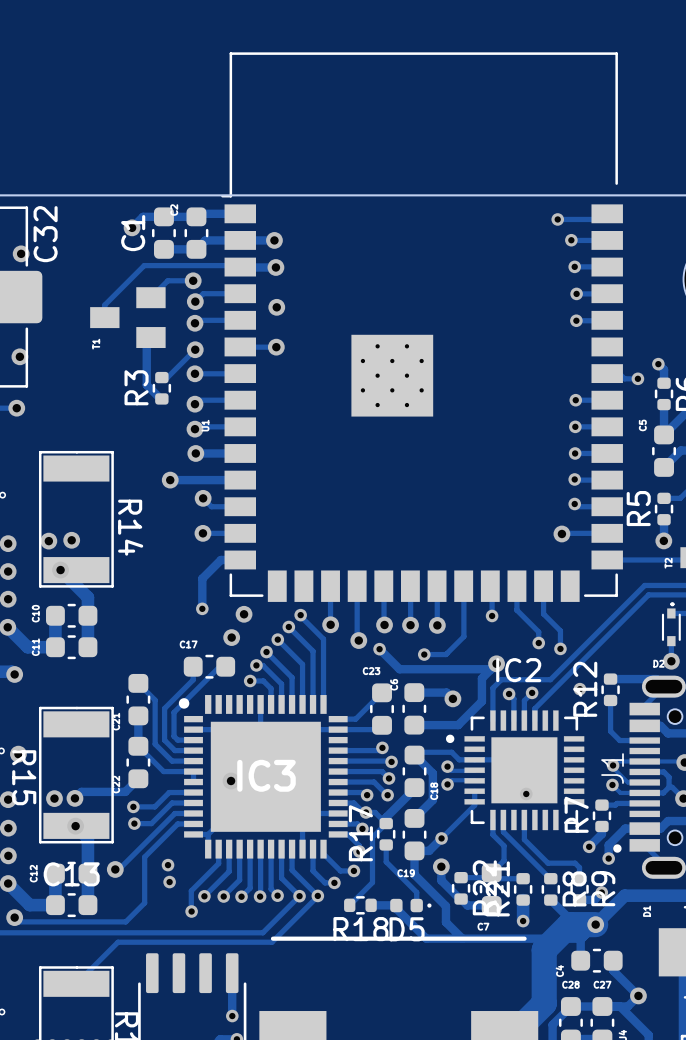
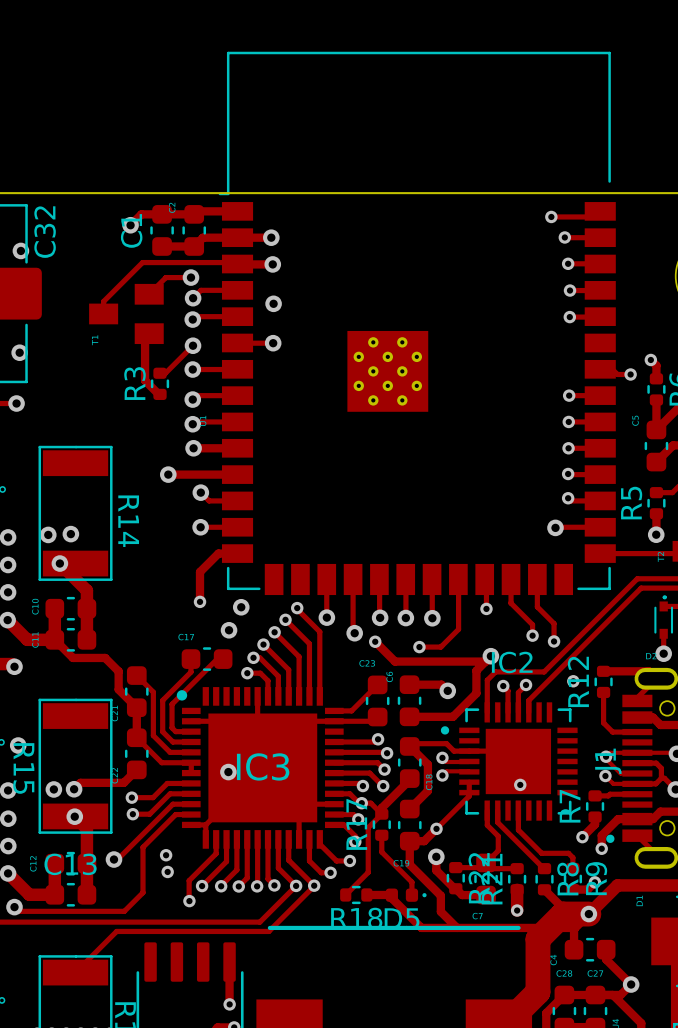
track: none -> (54, 639) (72, 657) (105, 657) (118, 671) (118, 689) (136, 707)

